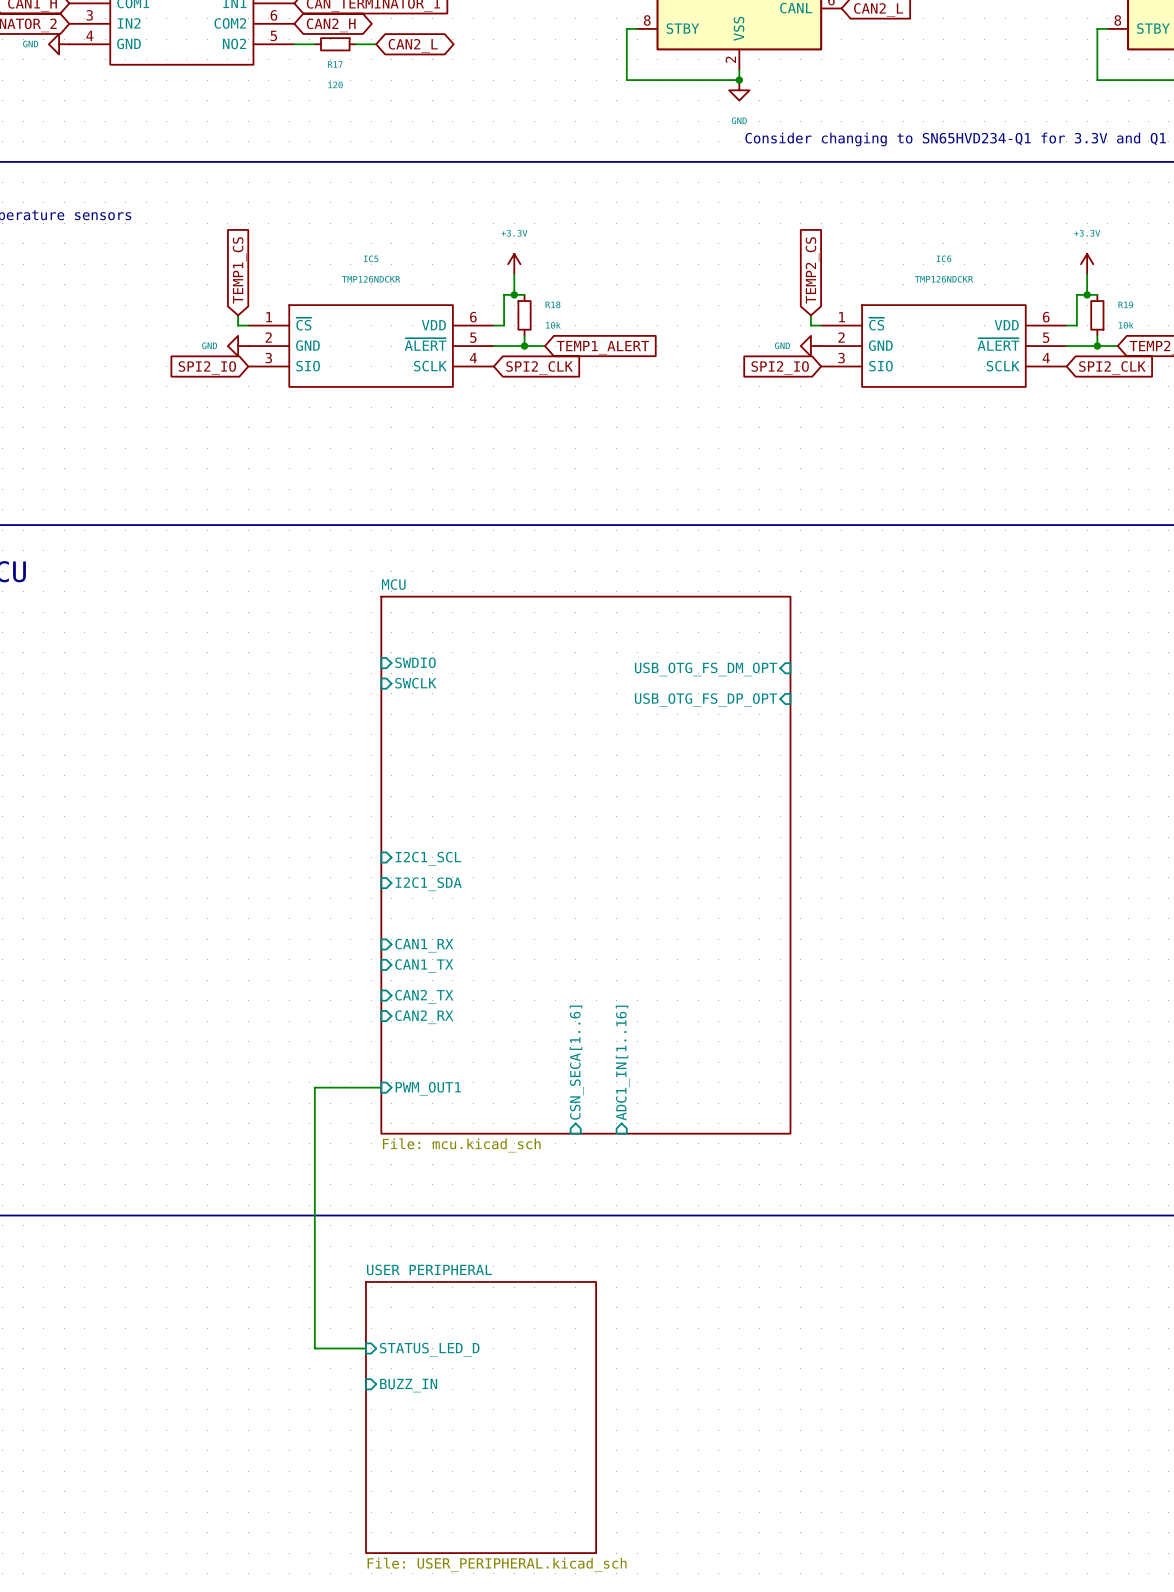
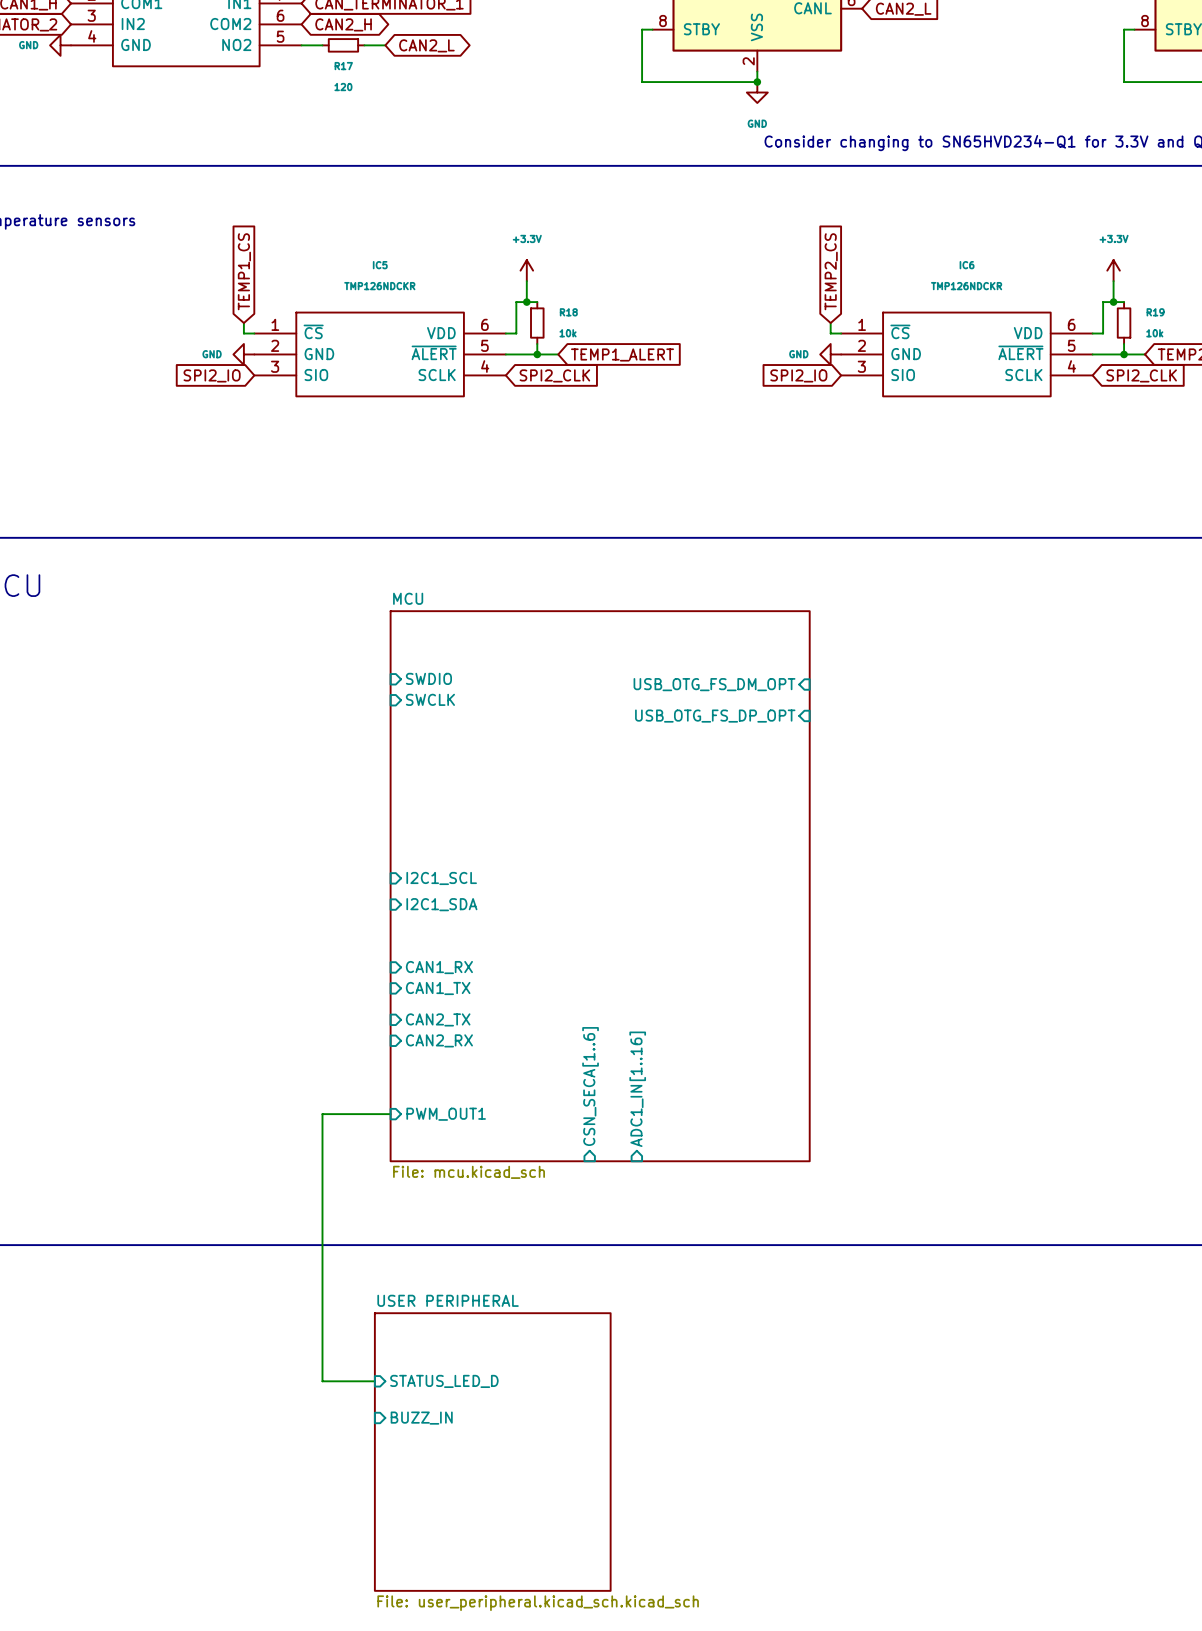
sheet USER PERIPHERAL value: File: USER_PERIPHERAL.kicad_sch (497, 1564) -> File: user_peripheral.kicad_sch.kicad_sch (538, 1603)

